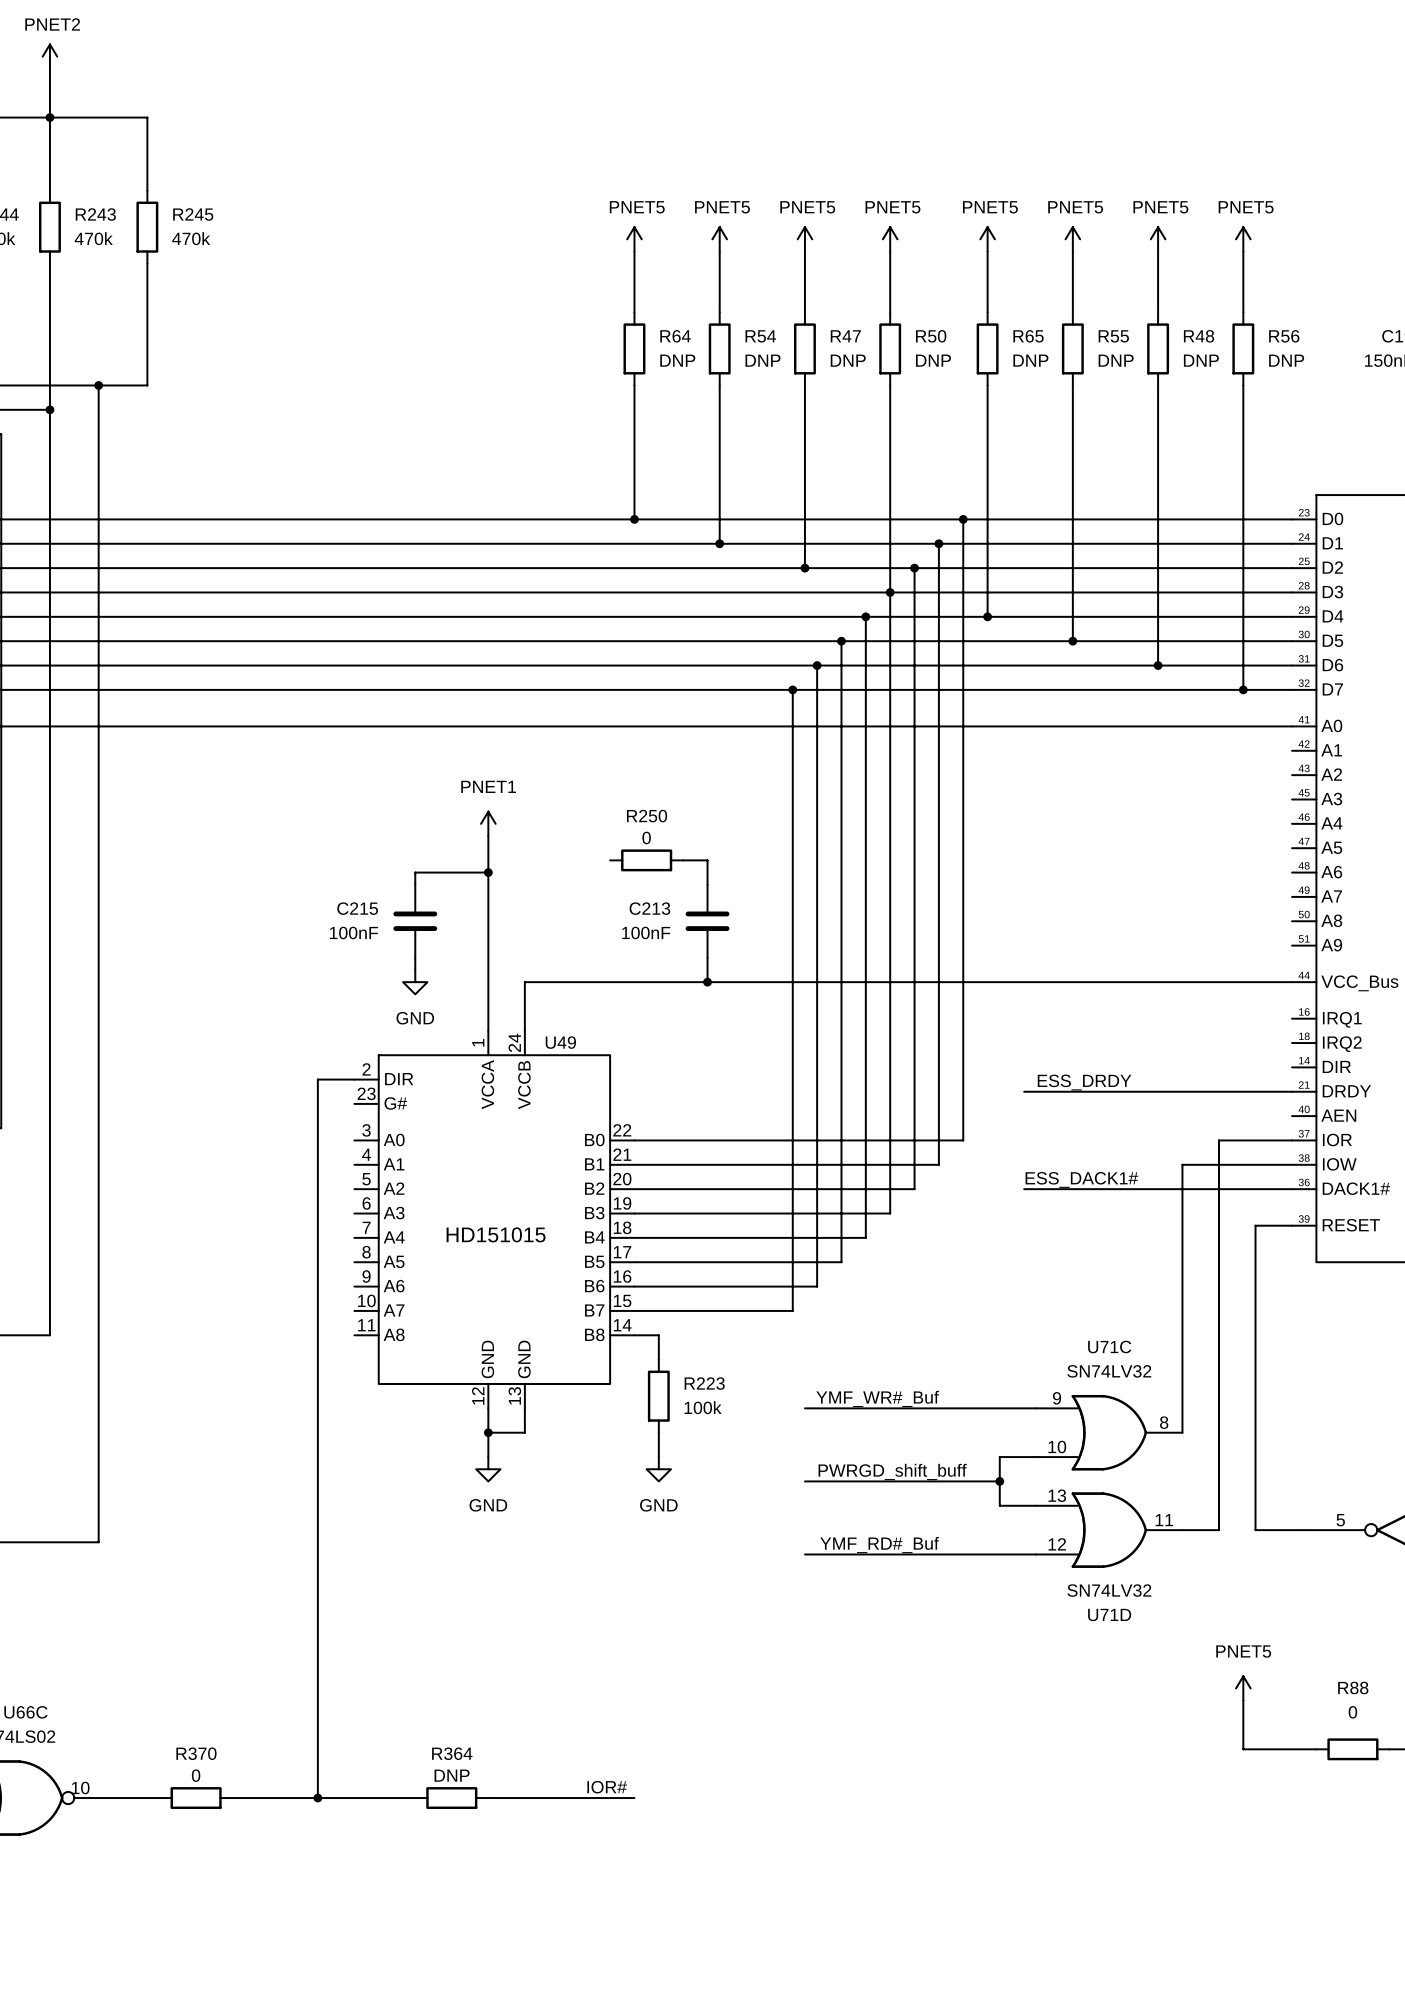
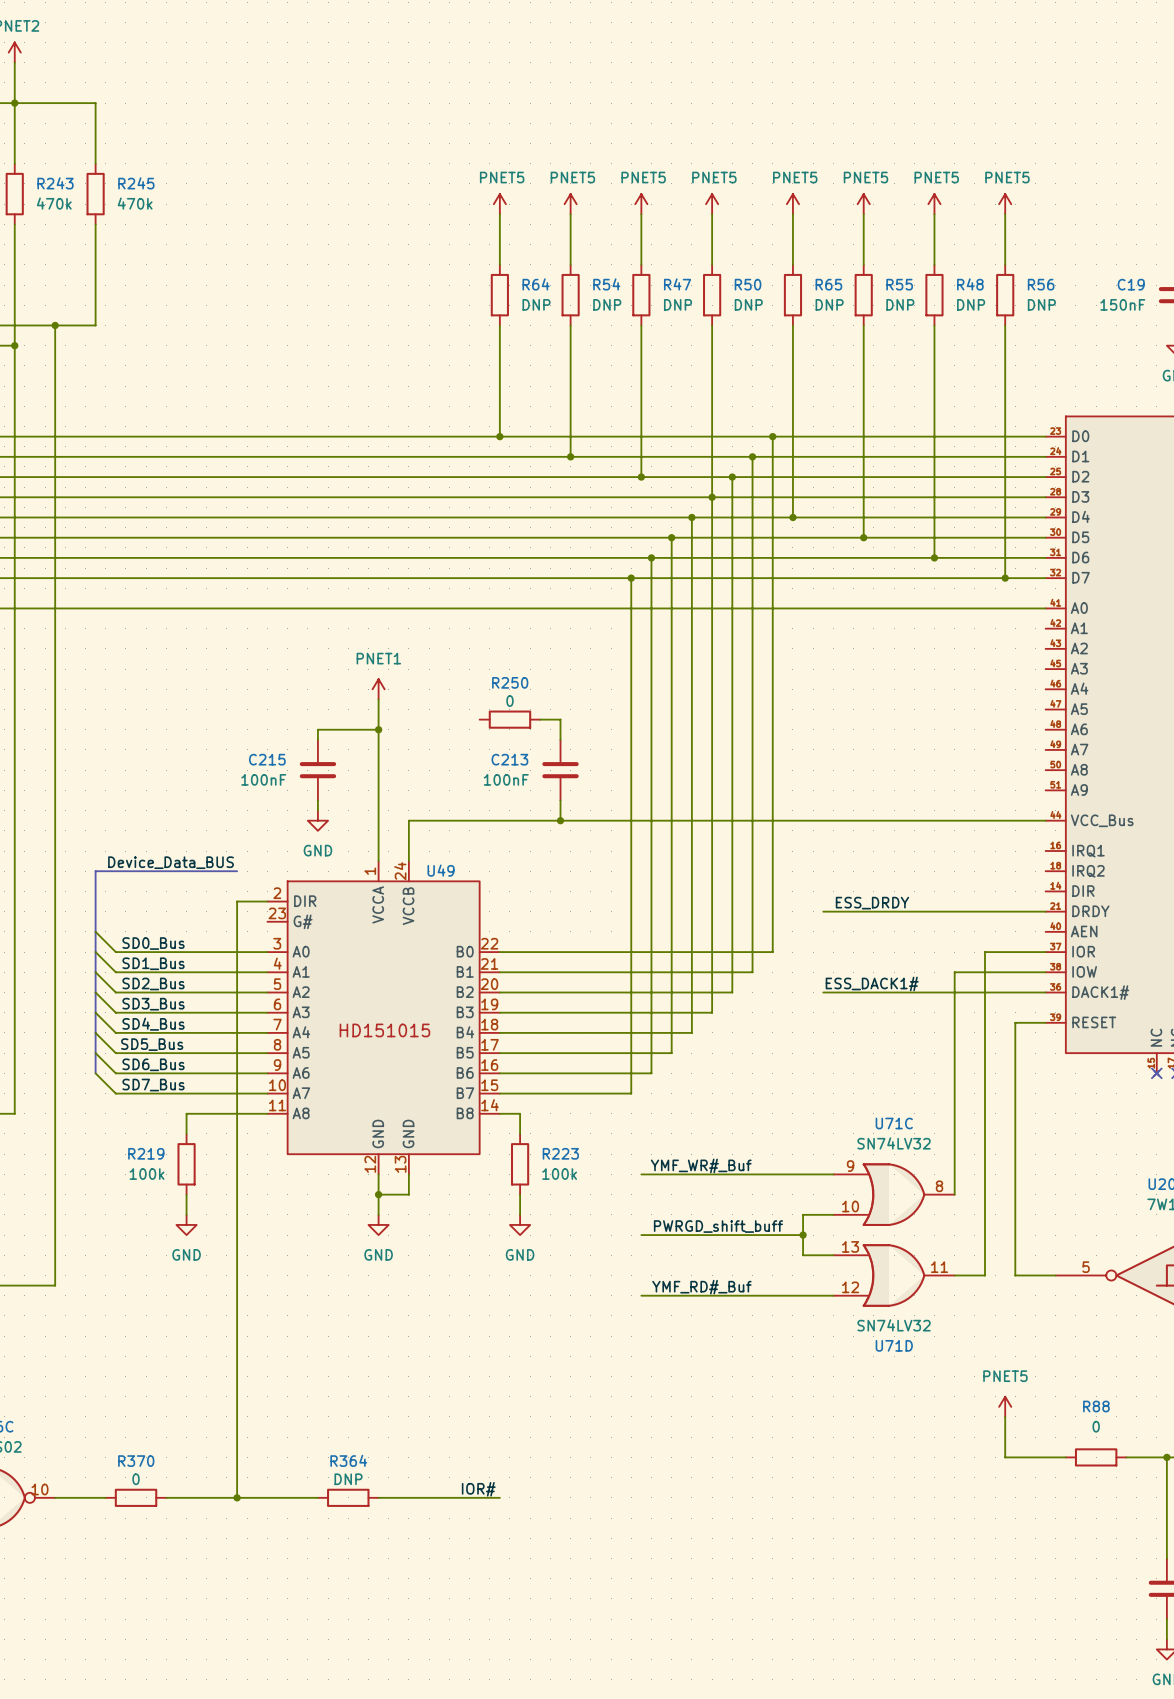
label: none -> Device_Data_BUS (171, 862)
bus: none -> (237, 871) (95, 871) (95, 1073)
wire: none -> (95, 931) (115, 952) (267, 952)
label: none -> SD0_Bus (153, 943)
wire: none -> (95, 952) (115, 972) (267, 972)
label: none -> SD1_Bus (153, 963)
wire: none -> (95, 972) (115, 992) (267, 992)
label: none -> SD2_Bus (153, 983)
wire: none -> (95, 992) (115, 1012) (267, 1012)
label: none -> SD3_Bus (153, 1004)
wire: none -> (95, 1012) (115, 1032) (267, 1032)
label: none -> SD4_Bus (153, 1024)
wire: none -> (95, 1032) (115, 1053) (267, 1053)
label: none -> SD5_Bus (152, 1044)
wire: none -> (95, 1053) (115, 1073) (267, 1073)
label: none -> SD6_Bus (153, 1064)
wire: none -> (95, 1073) (115, 1093) (267, 1093)
label: none -> SD7_Bus (153, 1085)
wire: none -> (267, 1113) (186, 1113) (186, 1133)
R219: none -> 100k (186, 1164)
wire: none -> (186, 1194) (186, 1214)
power symbol: none -> GND (186, 1224)

